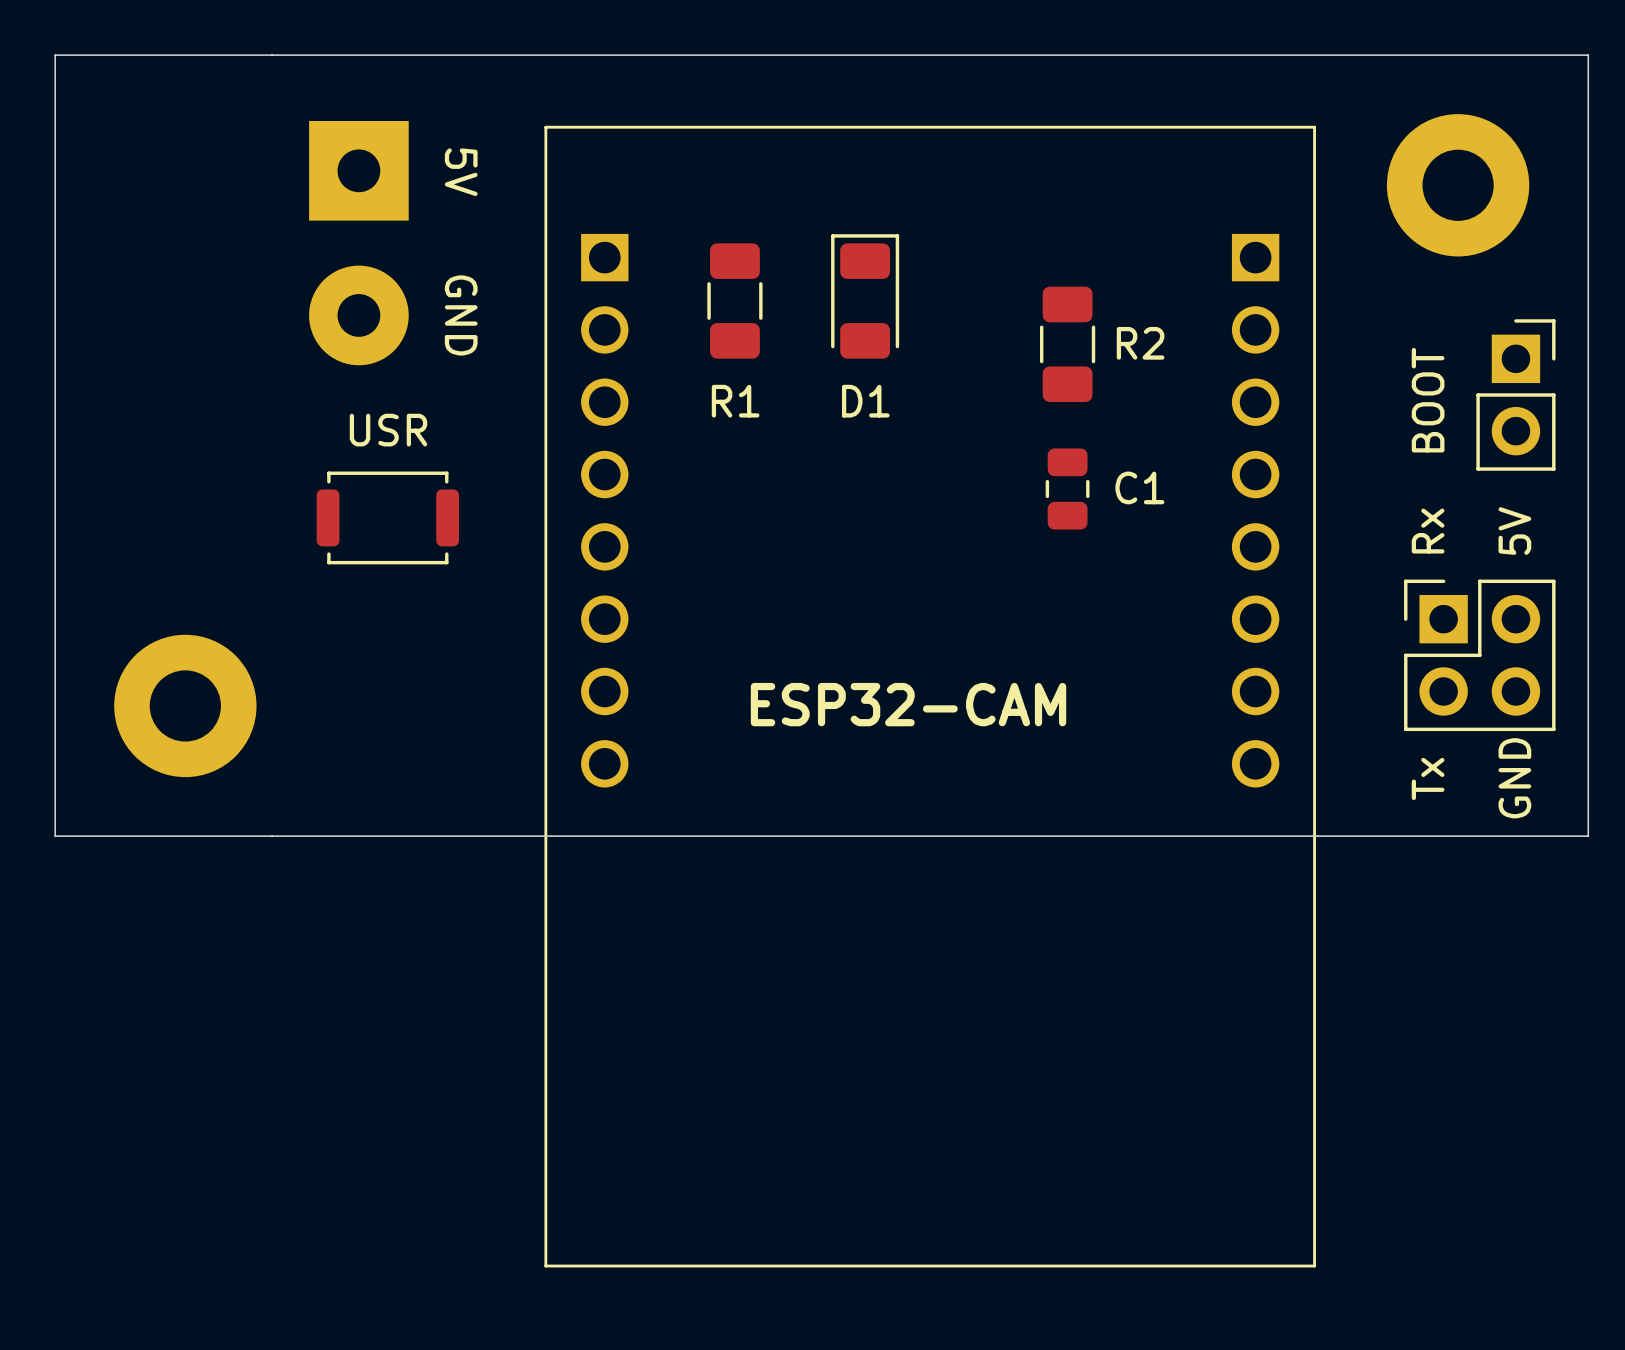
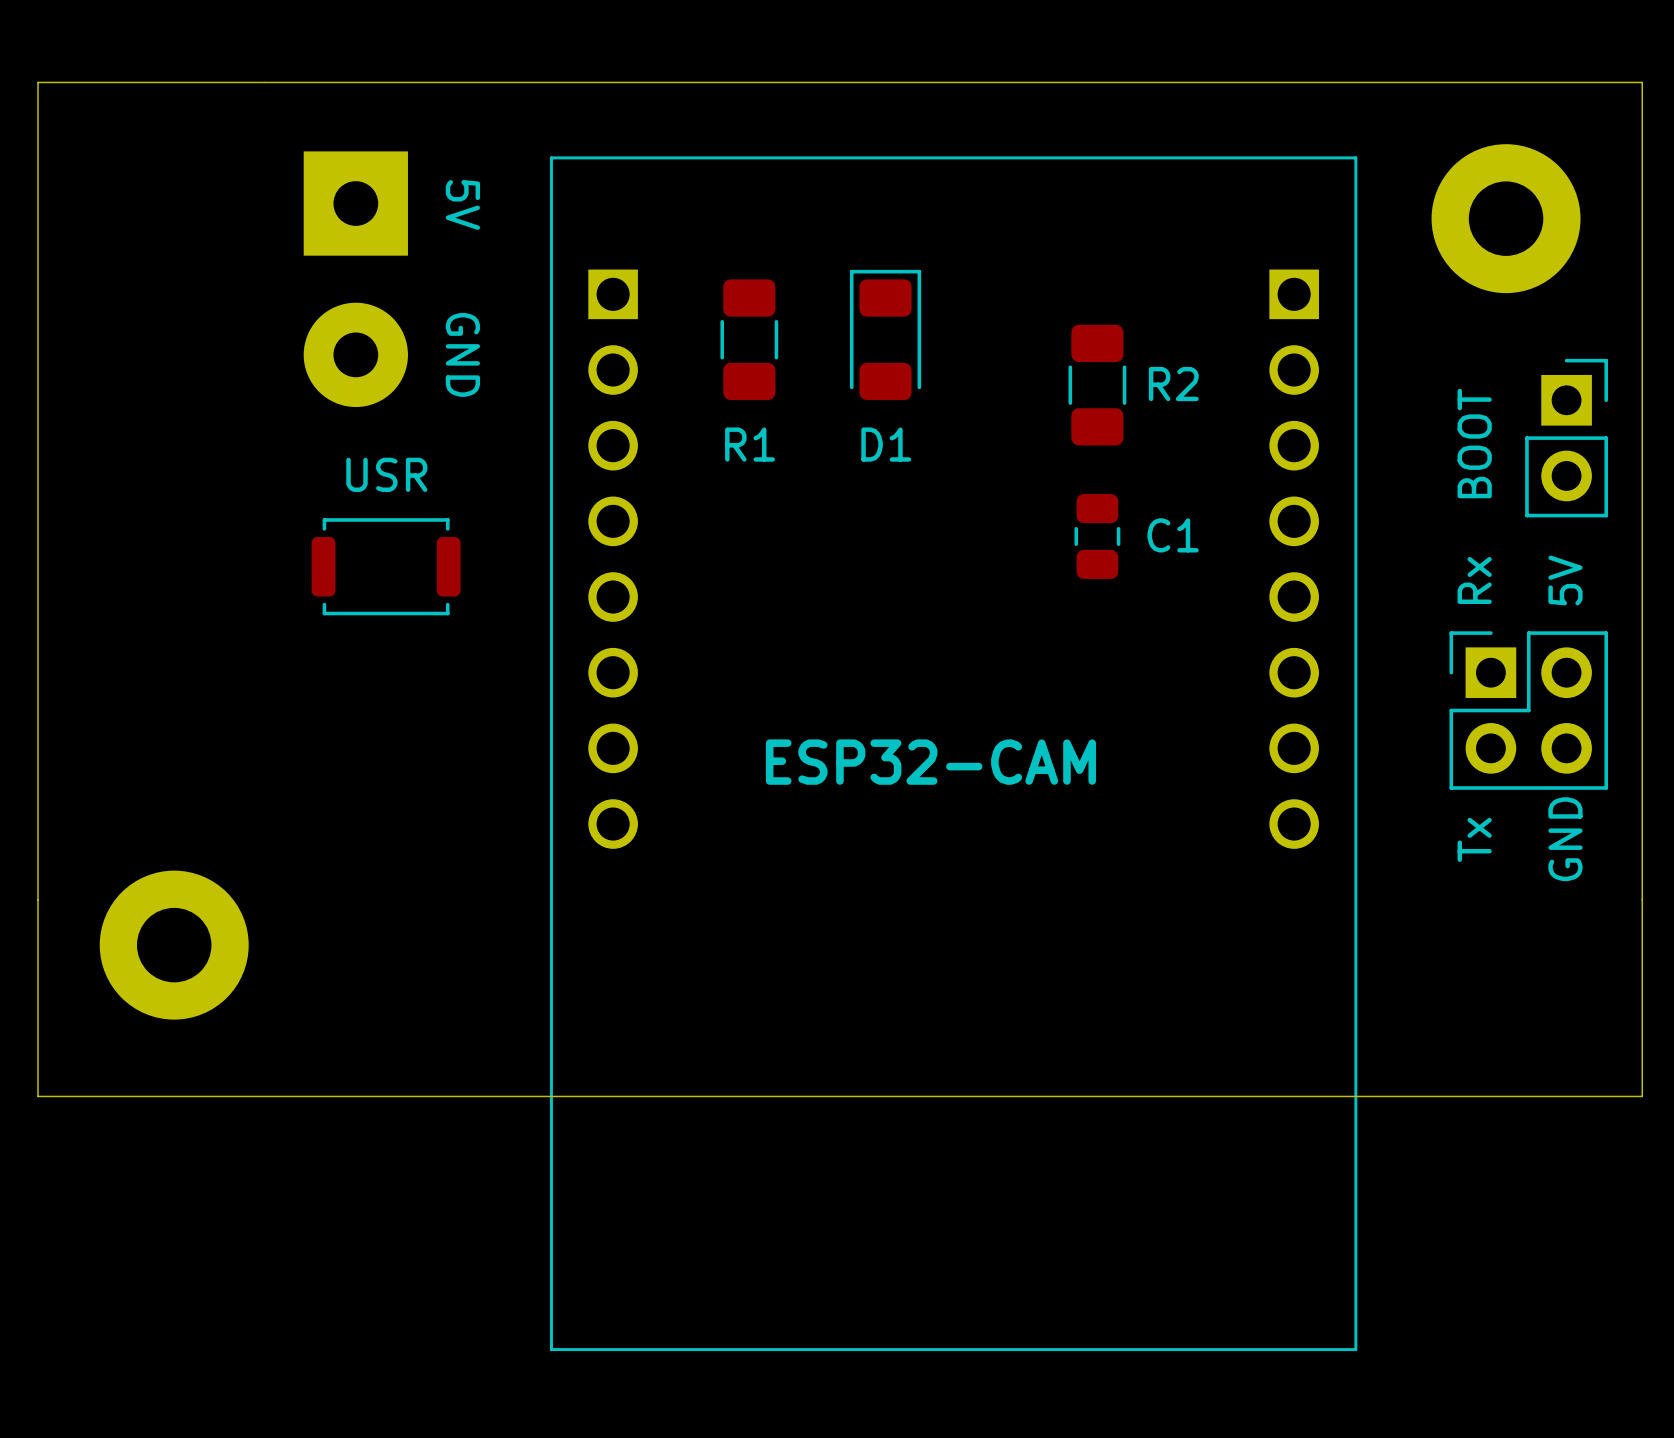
part position: (185, 705) -> (174, 945)
board edge: (55, 836) (1588, 836) -> (38, 899) (38, 1096) (1642, 1096) (1642, 899)

